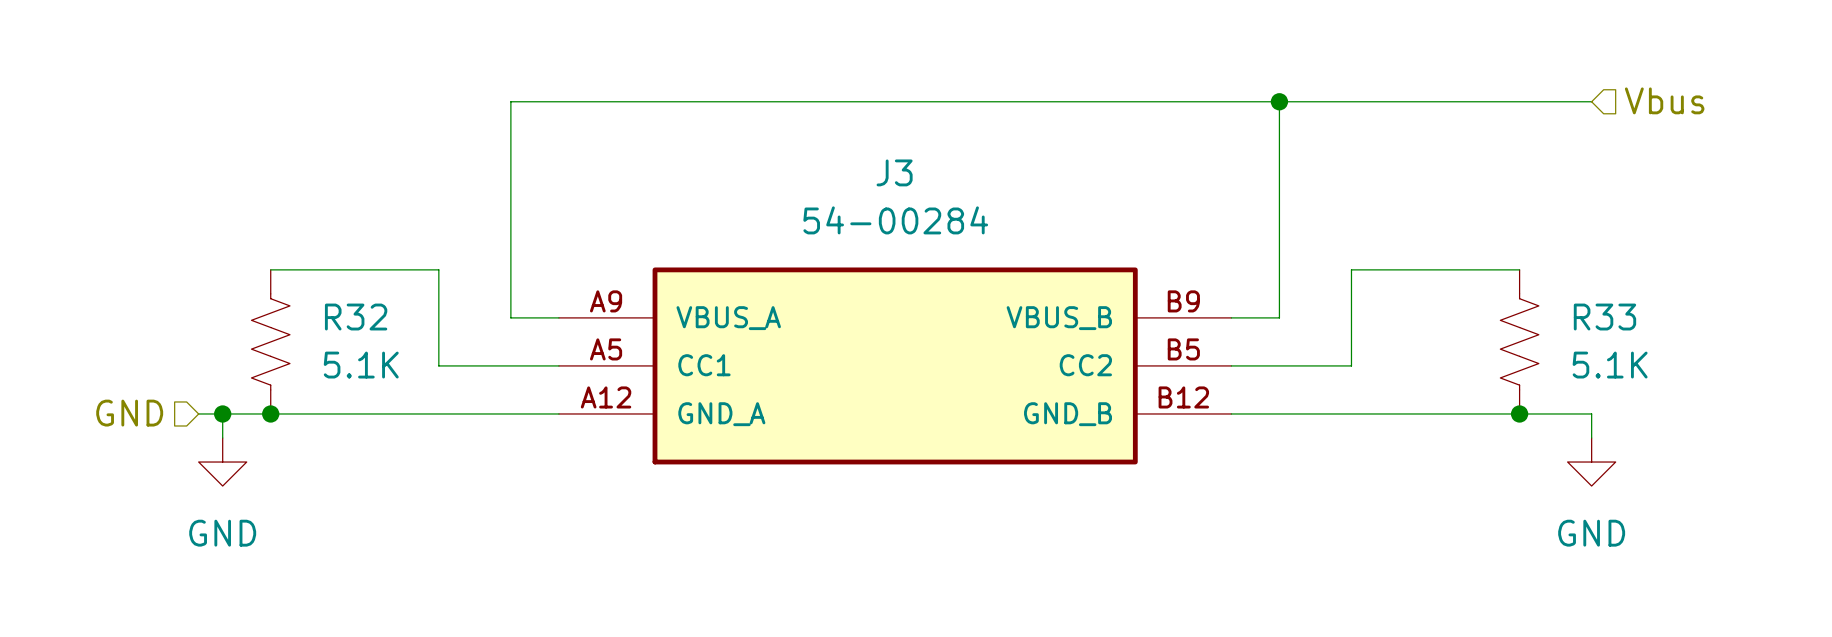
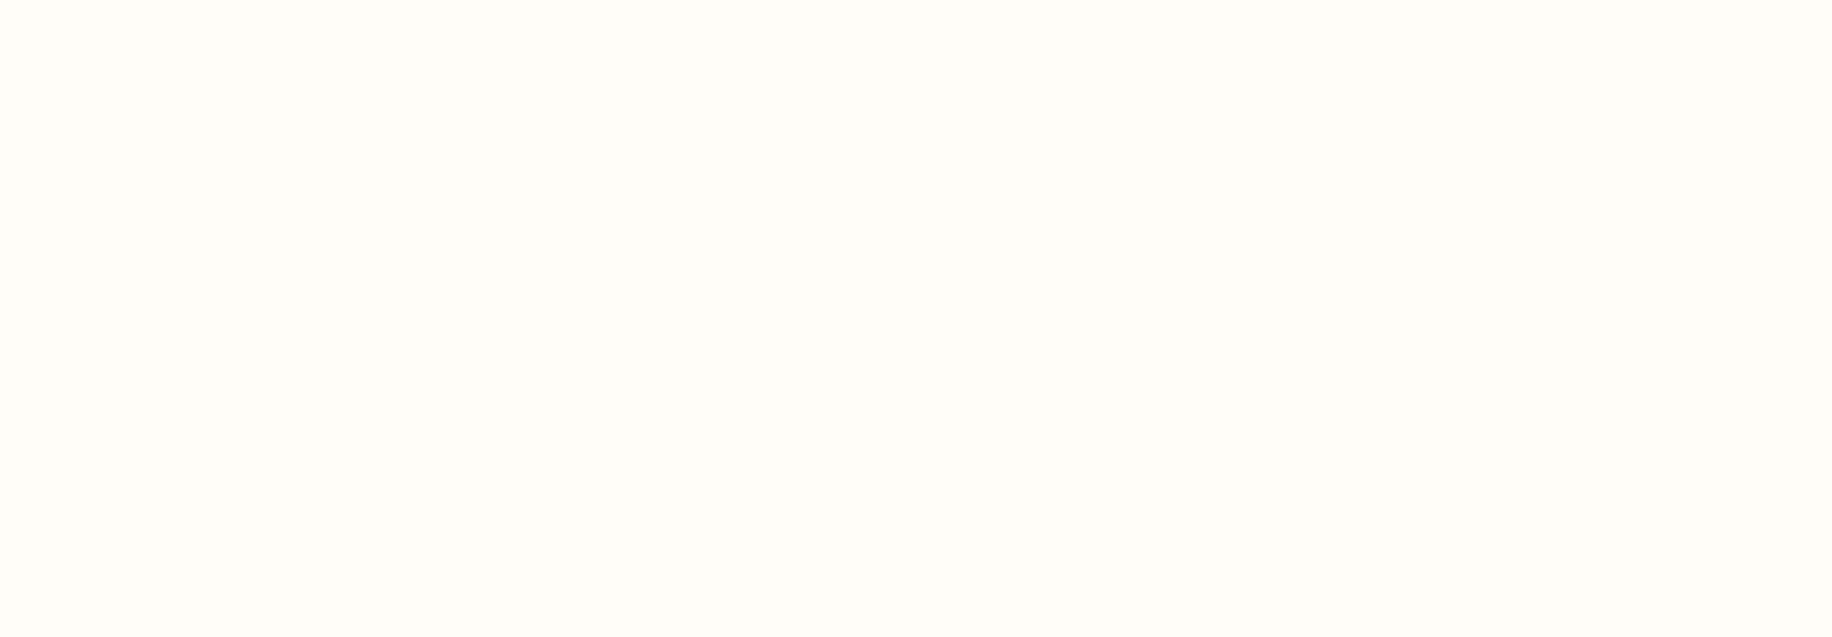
hierarchical label: Vbus (1664, 100) -> none
wire: (1279, 101) (1279, 317) (1231, 317) -> none
junction: (1279, 101) -> none
wire: (1591, 101) (510, 101) (510, 317) (558, 317) -> none
wire: (270, 269) (438, 269) (438, 365) (558, 365) -> none
wire: (1519, 269) (1351, 269) (1351, 365) (1231, 365) -> none
R32: 5.1K (270, 341) -> none
R33: 5.1K (1519, 341) -> none
J3: 54-00284 (895, 365) -> none
hierarchical label: GND (129, 413) -> none
wire: (198, 413) (558, 413) -> none
wire: (222, 413) (222, 438) -> none
junction: (222, 413) -> none
junction: (270, 413) -> none
wire: (1231, 413) (1591, 413) (1591, 438) -> none
junction: (1519, 413) -> none
power symbol: GND (222, 462) -> none
power symbol: GND (1591, 462) -> none

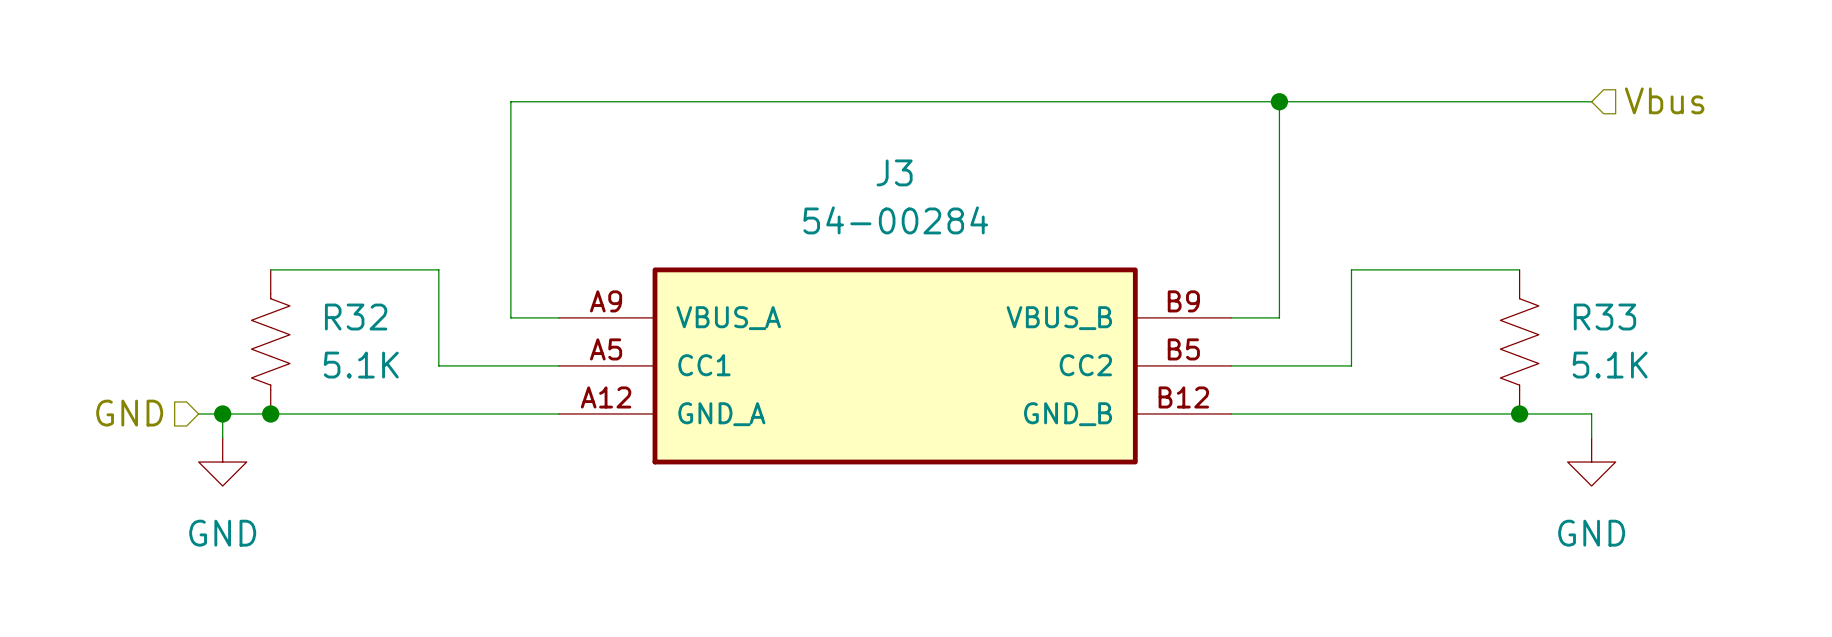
hierarchical label: none -> Vbus (1664, 100)
wire: none -> (1279, 101) (1279, 317) (1231, 317)
junction: none -> (1279, 101)
wire: none -> (1591, 101) (510, 101) (510, 317) (558, 317)
wire: none -> (270, 269) (438, 269) (438, 365) (558, 365)
wire: none -> (1519, 269) (1351, 269) (1351, 365) (1231, 365)
R32: none -> 5.1K (270, 341)
R33: none -> 5.1K (1519, 341)
J3: none -> 54-00284 (895, 365)
hierarchical label: none -> GND (129, 413)
wire: none -> (198, 413) (558, 413)
wire: none -> (222, 413) (222, 438)
junction: none -> (222, 413)
junction: none -> (270, 413)
wire: none -> (1231, 413) (1591, 413) (1591, 438)
junction: none -> (1519, 413)
power symbol: none -> GND (222, 462)
power symbol: none -> GND (1591, 462)

